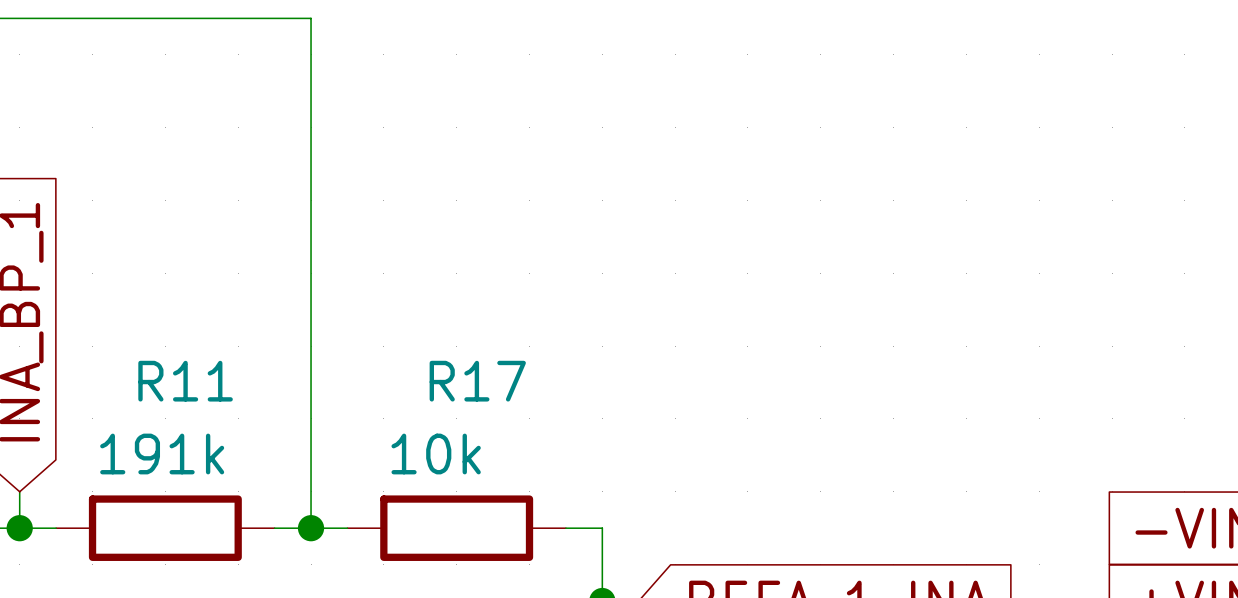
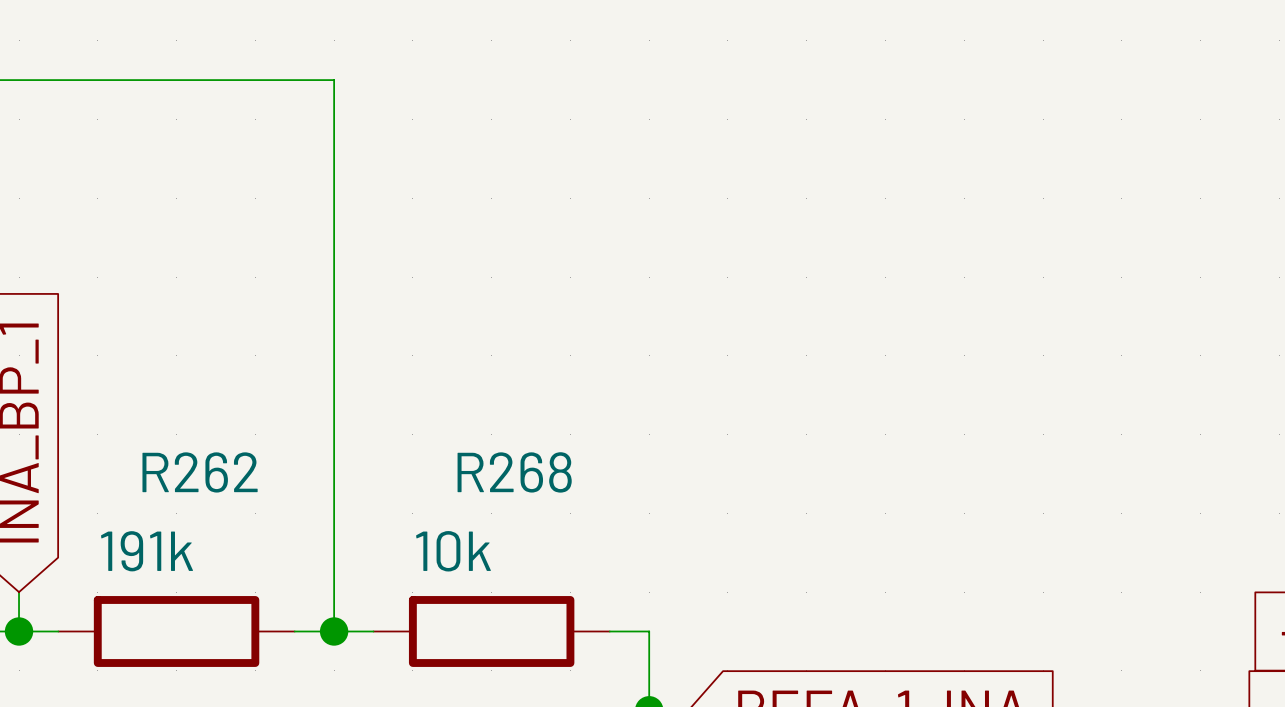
R11 name: R11 (185, 381) -> R262 (200, 472)
R17 name: R17 (477, 381) -> R268 (514, 472)

